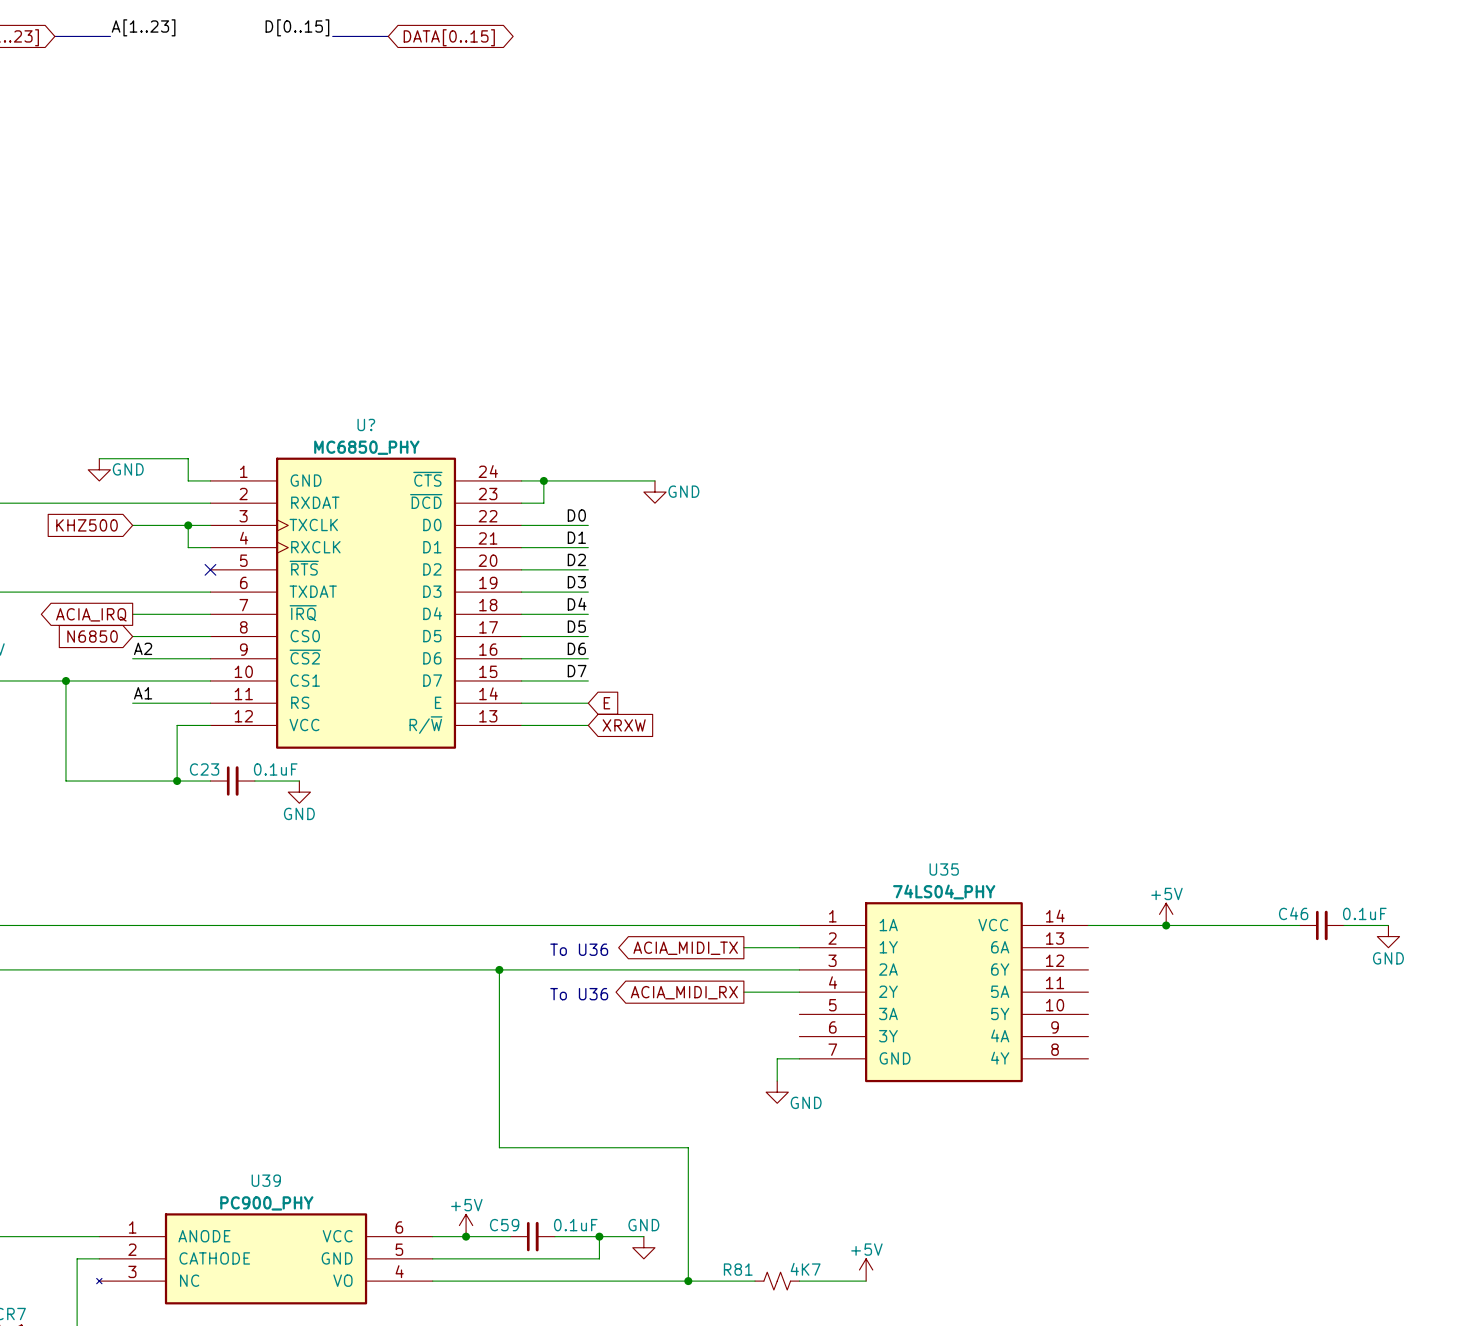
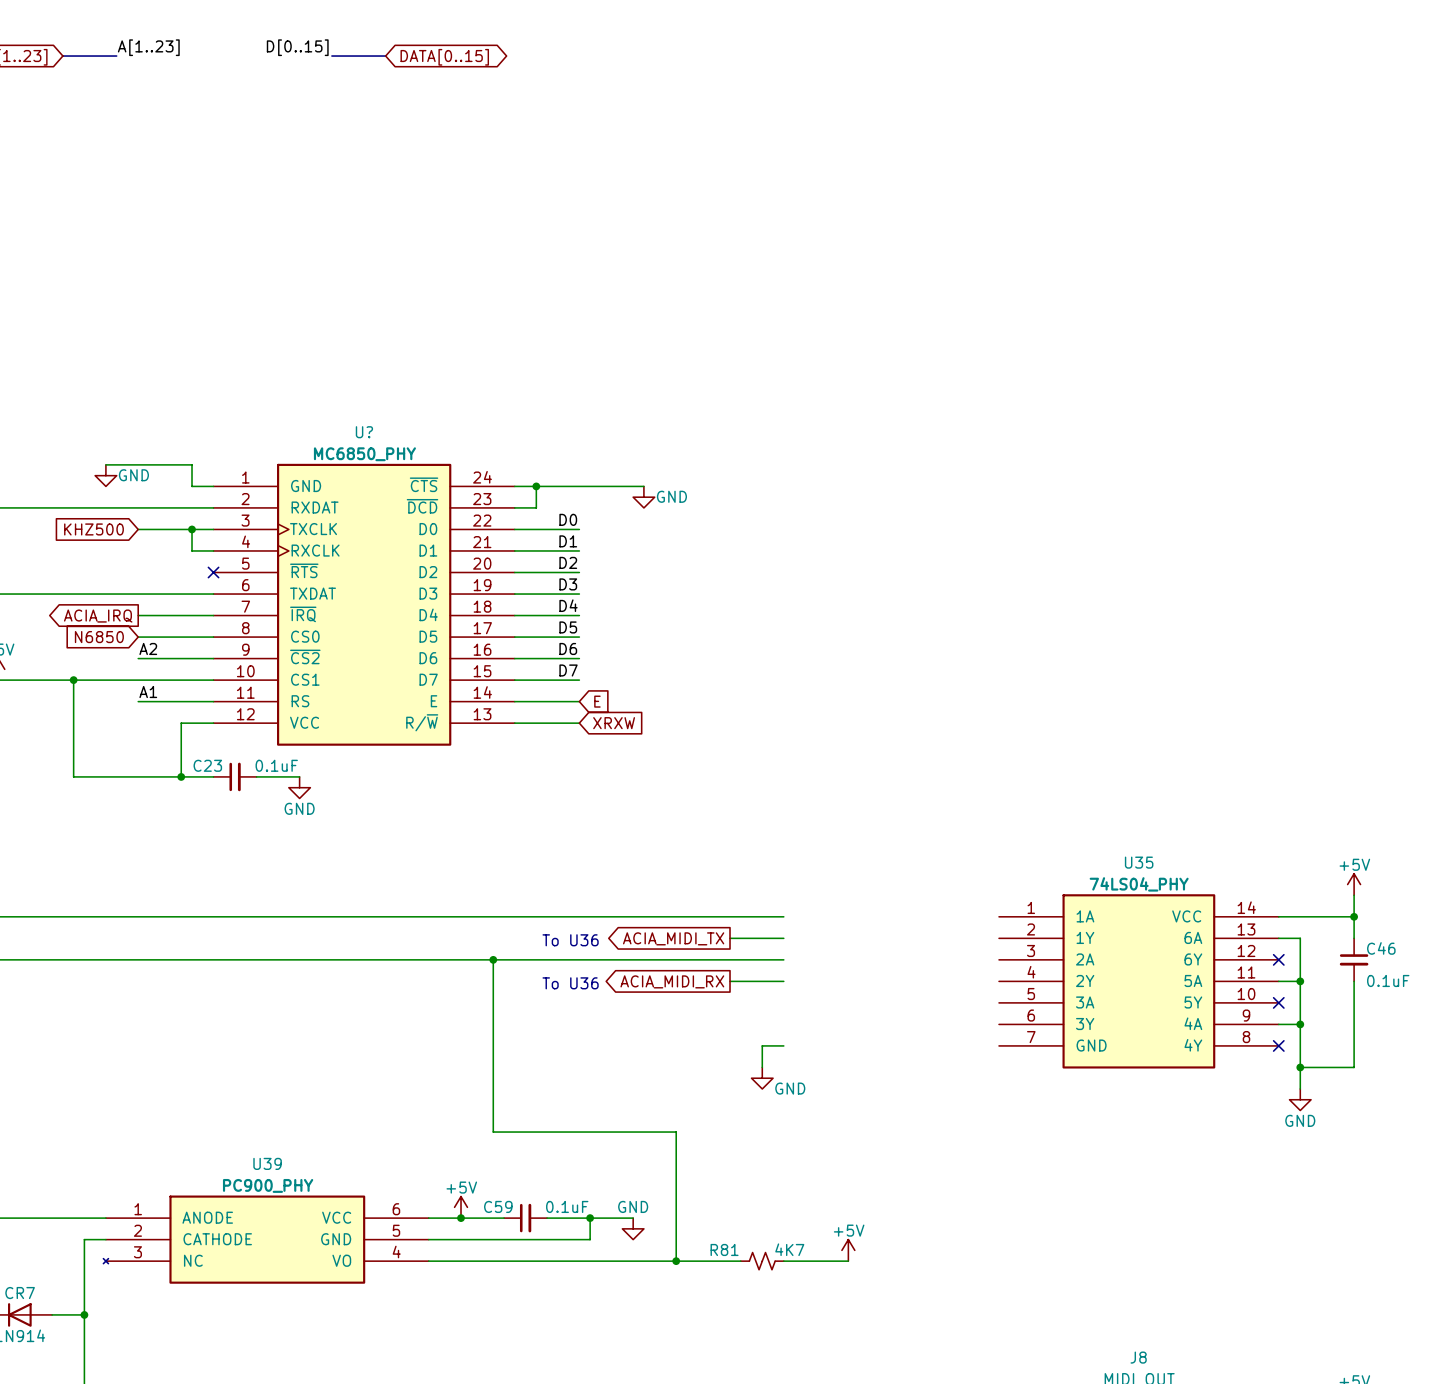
power symbol: none -> +5V (1354, 884)
wire: none -> (1354, 895) (1354, 938)
C46 name position: C46 (1293, 913) -> C46 (1381, 948)
C46 value position: 0.1uF (1364, 913) -> 0.1uF (1388, 980)
power symbol: +5V (1166, 914) -> none
junction: (1166, 925) -> none
C46 rotation: 0° (1321, 925) -> 90° clockwise (1354, 959)
C46 position: (1321, 925) -> (1354, 959)
junction: none -> (1354, 916)
power symbol position: GND (1388, 936) -> GND (1300, 1099)
wire: none -> (1278, 938) (1300, 938) (1300, 1088)
no-connect mark: none -> (1278, 959)
U35 position: (943, 992) -> (1138, 981)
wire: none -> (1278, 981) (1300, 981)
junction: none -> (1300, 981)
wire: none -> (1354, 981) (1354, 1067) (1300, 1067)
no-connect mark: none -> (1278, 1002)
wire: none -> (1278, 1024) (1300, 1024)
junction: none -> (1300, 1024)
no-connect mark: none -> (1278, 1045)
junction: none -> (1300, 1067)

